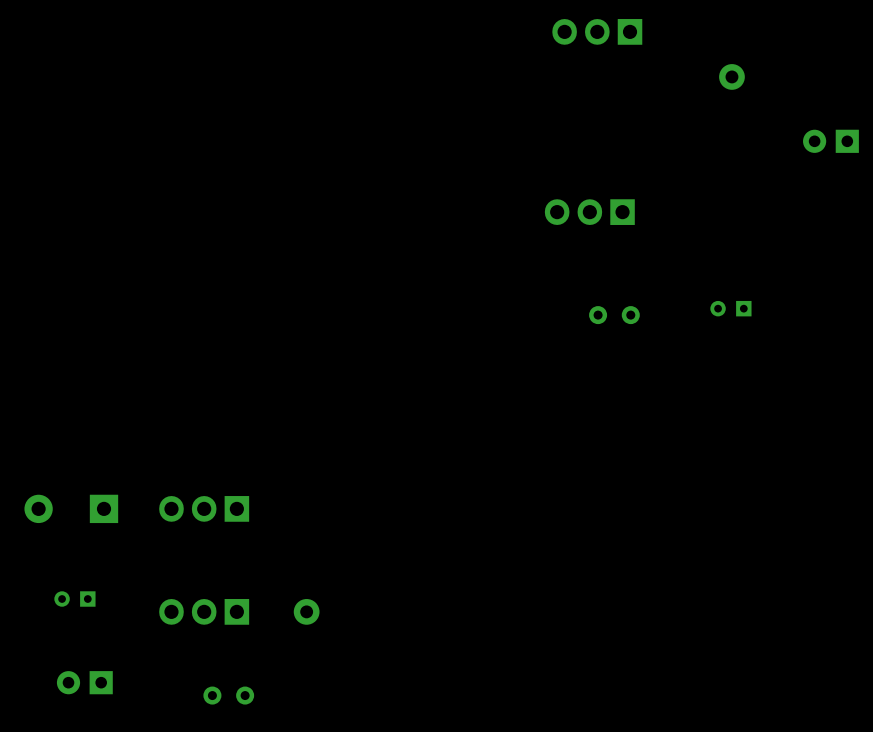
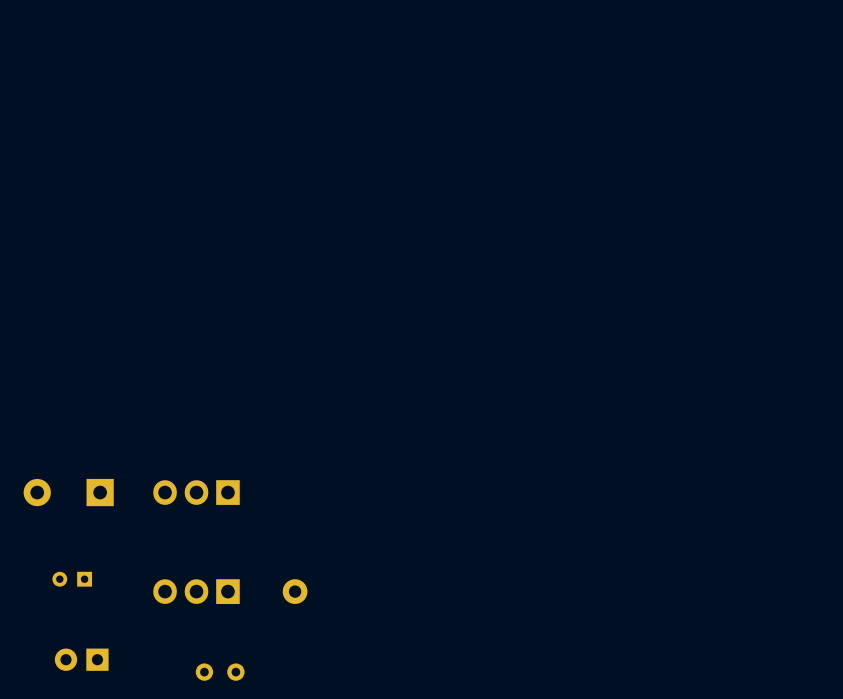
part: (597, 31) -> none
part: (731, 76) -> none
part: (830, 141) -> none
part: (589, 212) -> none
part: (730, 308) -> none
part: (614, 315) -> none

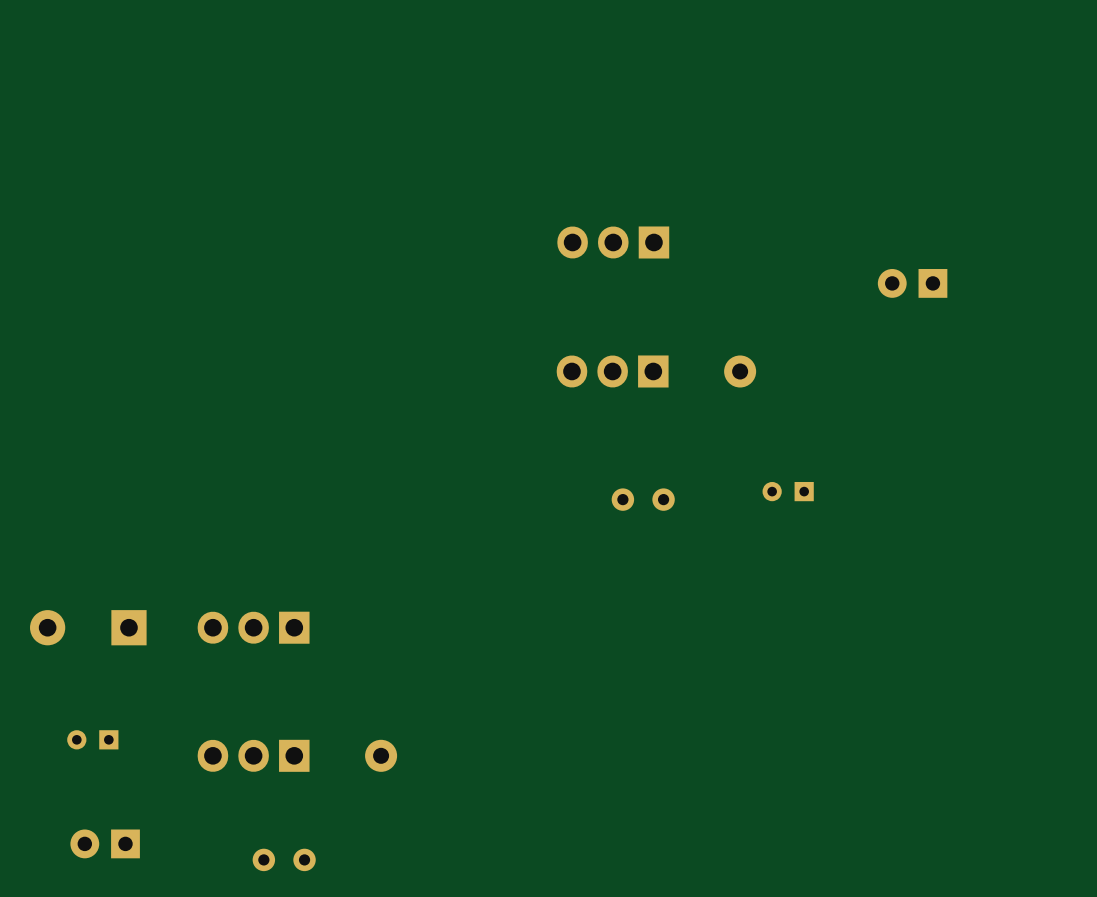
part: none -> (613, 242)
part: none -> (912, 283)
part: none -> (612, 371)
part: none -> (740, 371)
part: none -> (788, 491)
part: none -> (643, 499)

